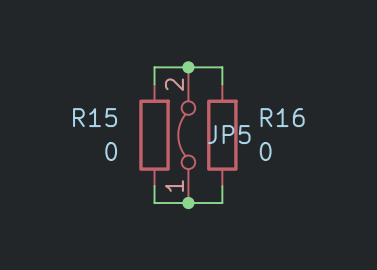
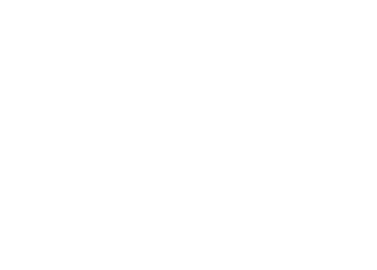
junction: (188, 67) -> none
wire: (154, 84) (154, 67) (222, 67) (222, 84) -> none
R15: 0 (154, 135) -> none
JP5: (186, 135) -> none
R16: 0 (222, 135) -> none
wire: (154, 186) (154, 203) (222, 203) (222, 186) -> none
junction: (188, 203) -> none

